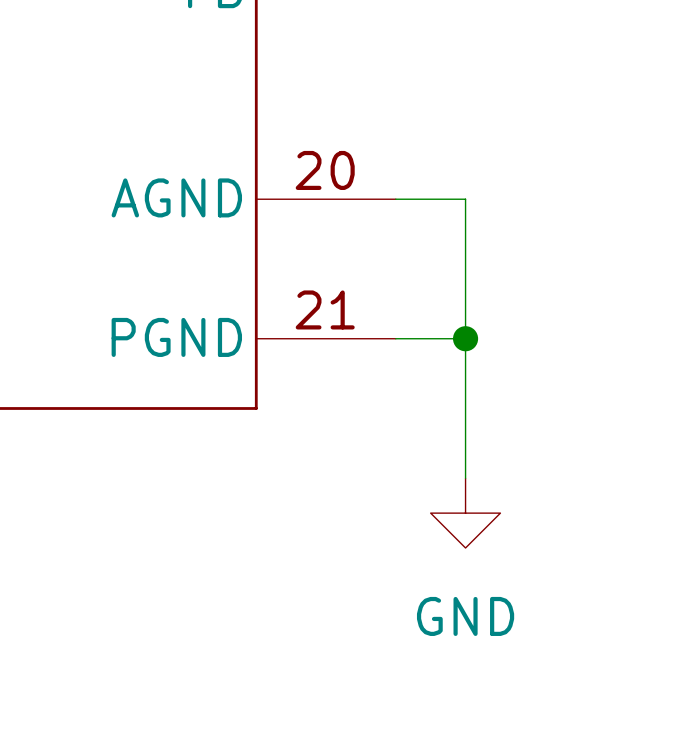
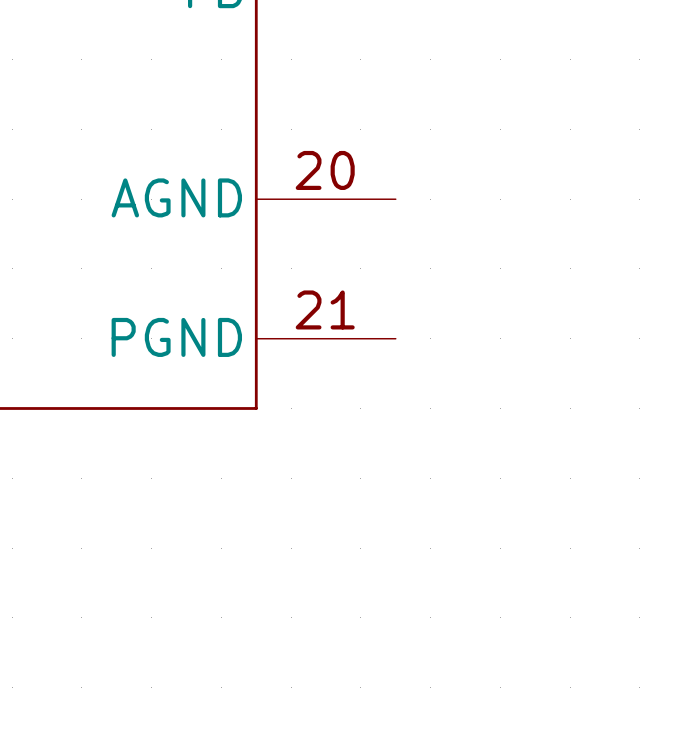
wire: (395, 199) (465, 199) (465, 478) -> none
wire: (395, 338) (465, 338) -> none
junction: (465, 338) -> none
power symbol: GND (465, 513) -> none

